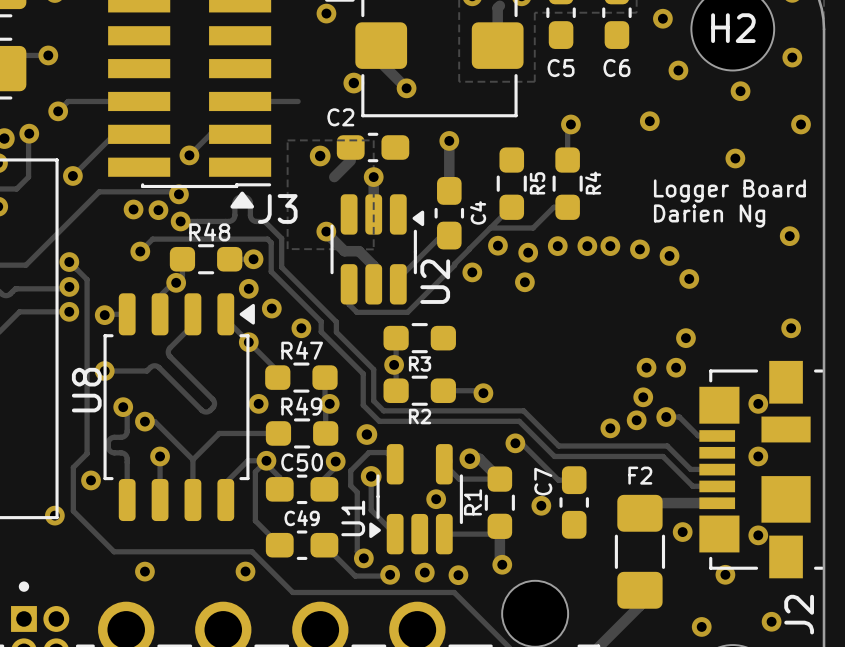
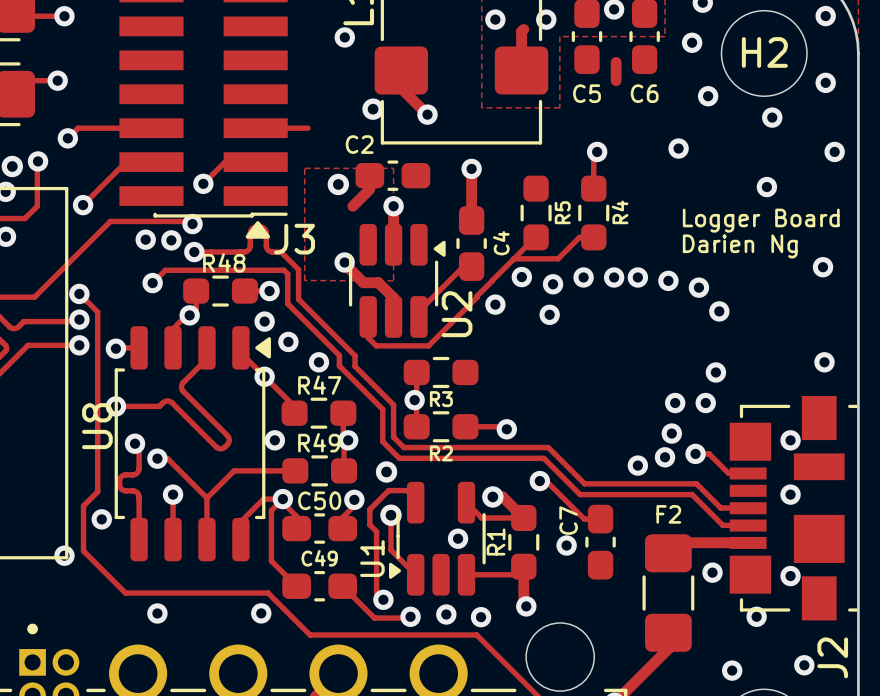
track: none -> (616, 62) (616, 80)
track: (290, 101) (298, 101) -> none

